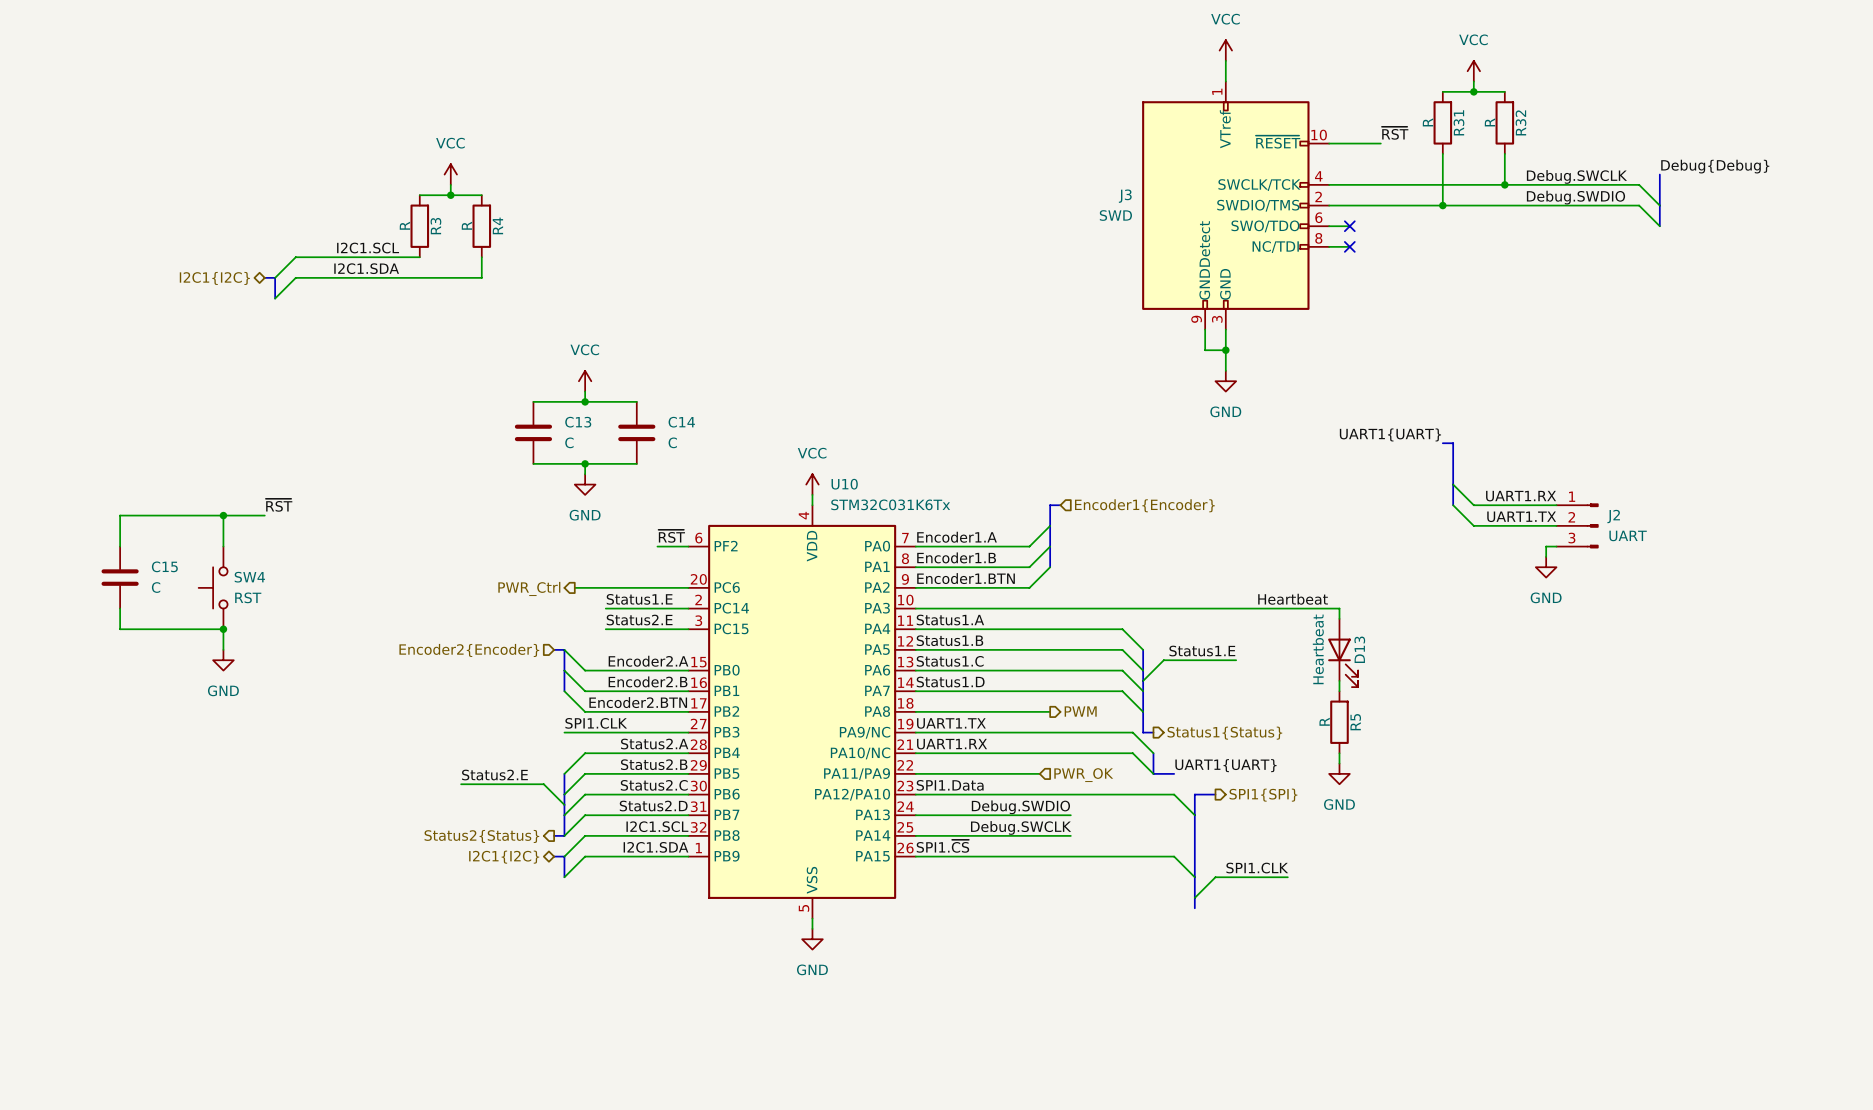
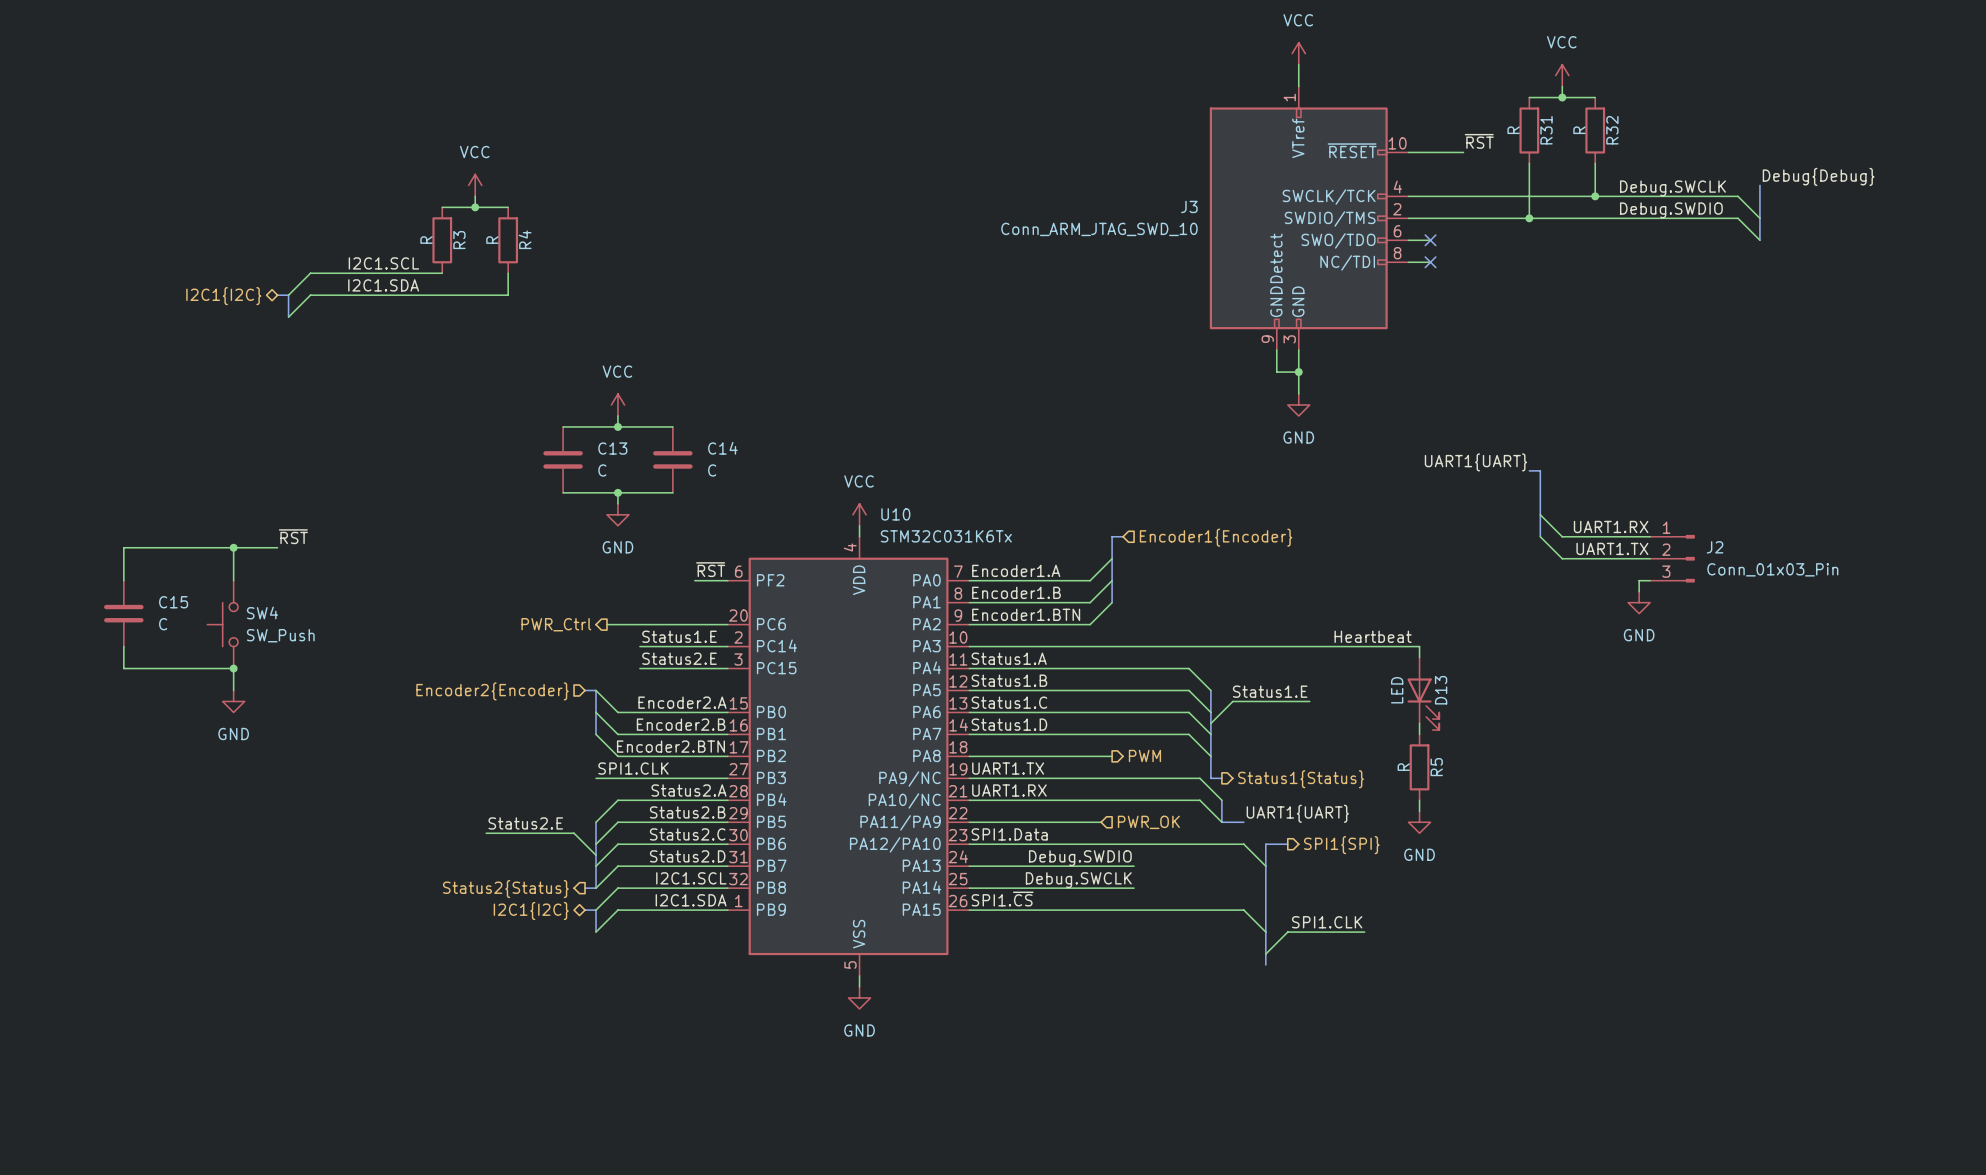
J3 value: SWD (1115, 215) -> Conn_ARM_JTAG_SWD_10 (1099, 229)
J2 value: UART (1628, 535) -> Conn_01x03_Pin (1772, 569)
SW4 value: RST (248, 597) -> SW_Push (280, 635)
D13 value: Heartbeat (1318, 649) -> LED (1397, 690)

